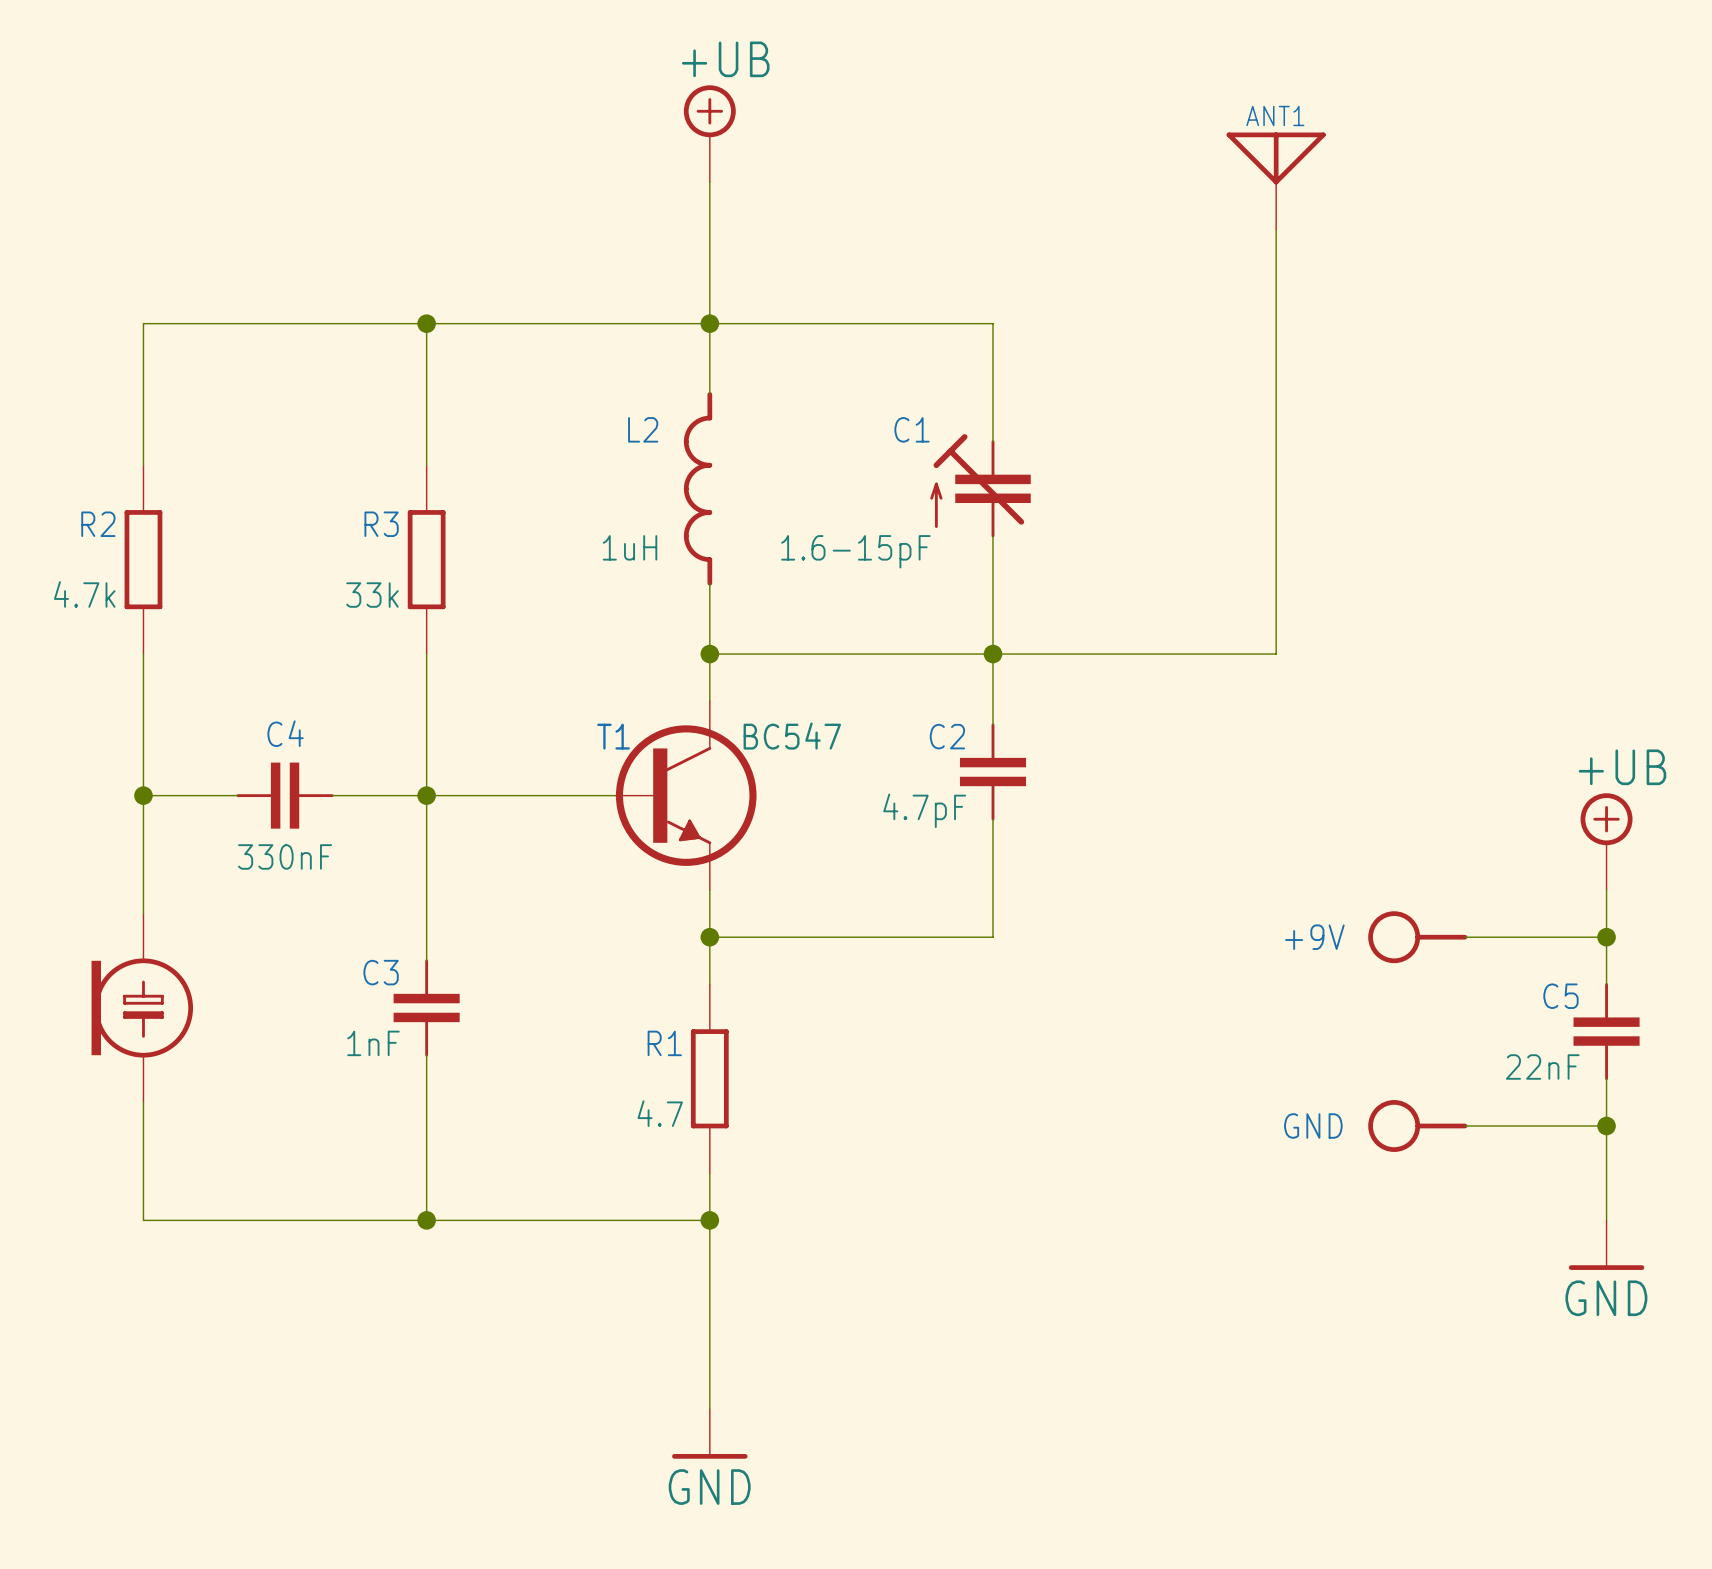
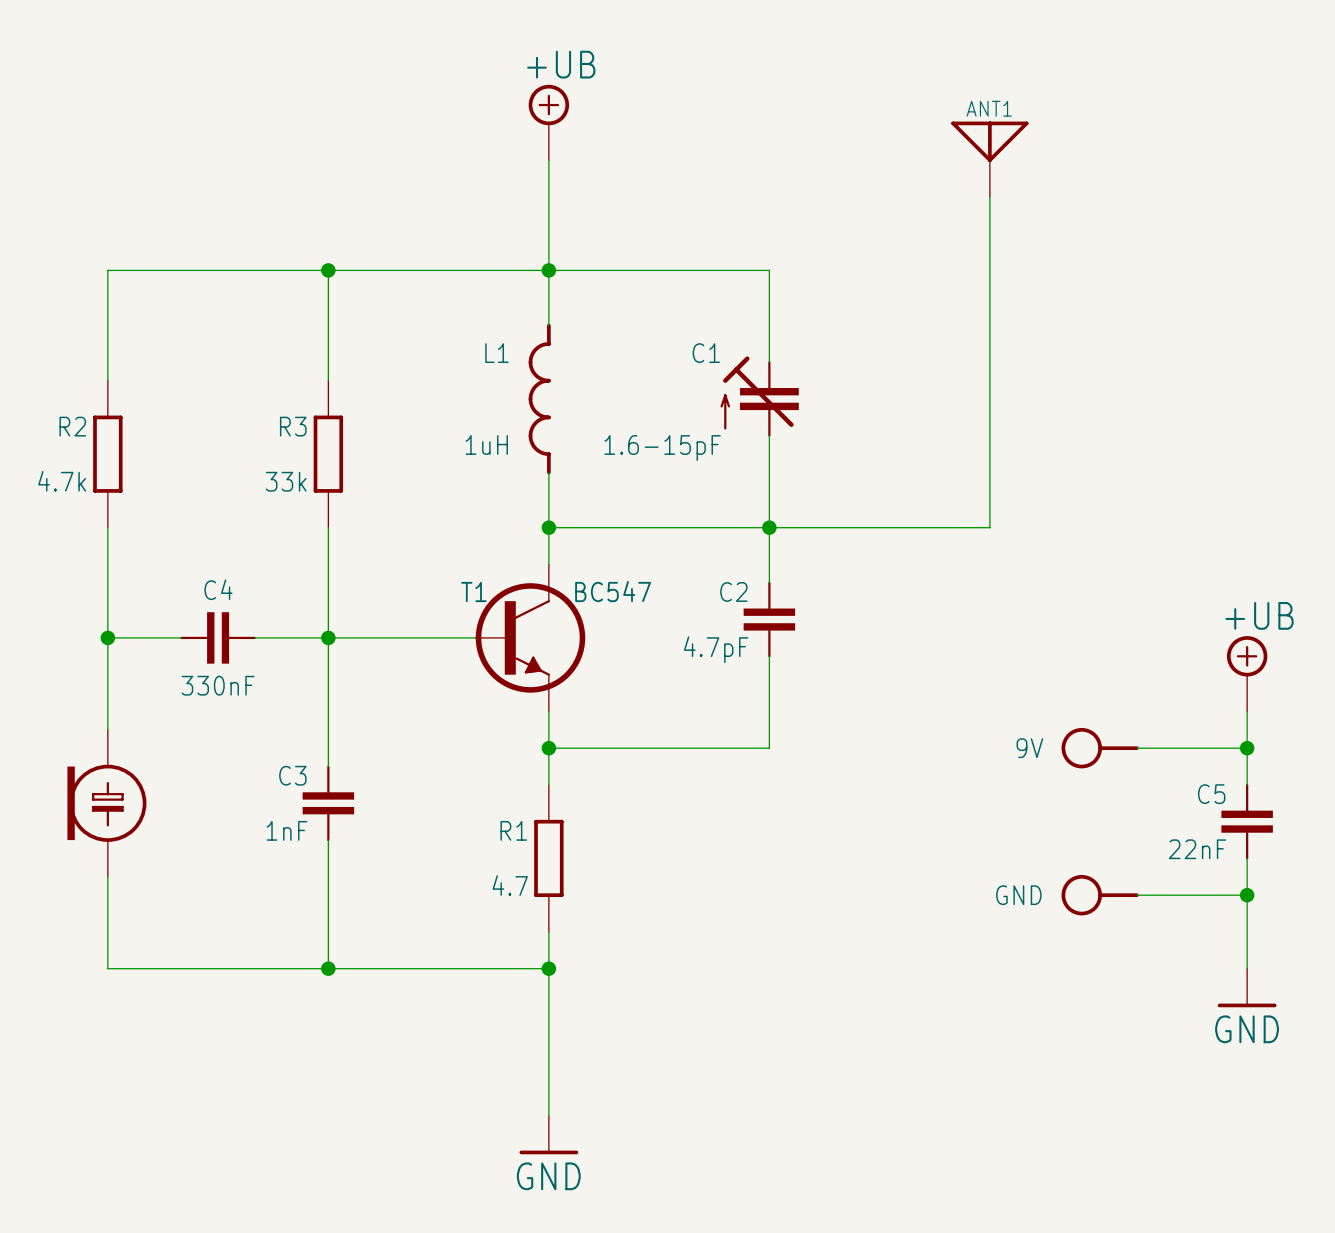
L2 name: L2 (643, 429) -> L1 (496, 353)
+9V name: +9V (1314, 937) -> 9V (1029, 748)

